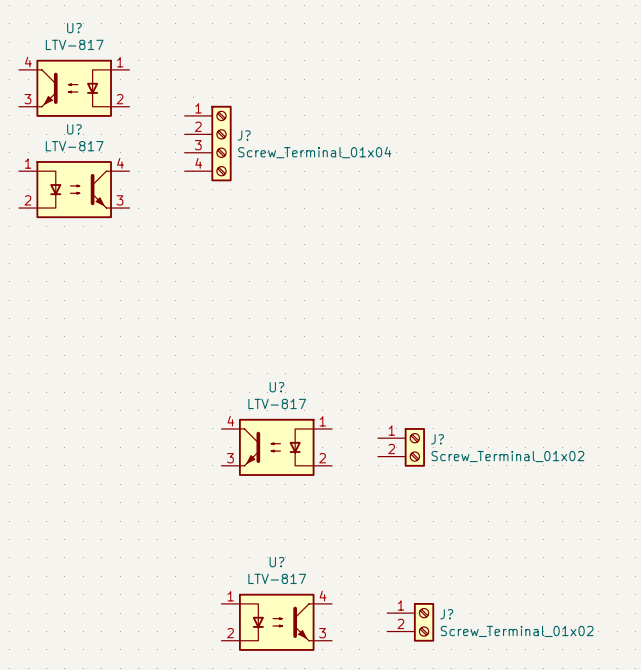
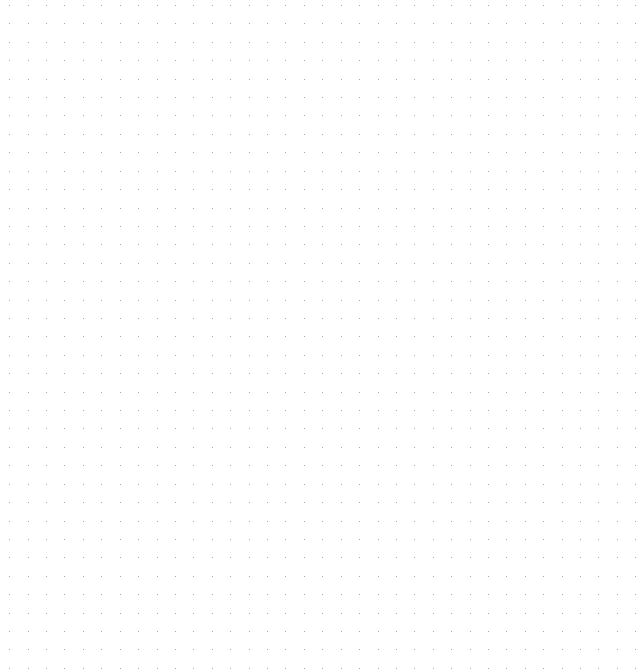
U?: LTV-817 (74, 88) -> none
J?: Screw_Terminal_01x04 (208, 143) -> none
U?: LTV-817 (74, 189) -> none
U?: LTV-817 (276, 447) -> none
J?: Screw_Terminal_01x02 (401, 447) -> none
U?: LTV-817 (276, 622) -> none
J?: Screw_Terminal_01x02 (410, 622) -> none

